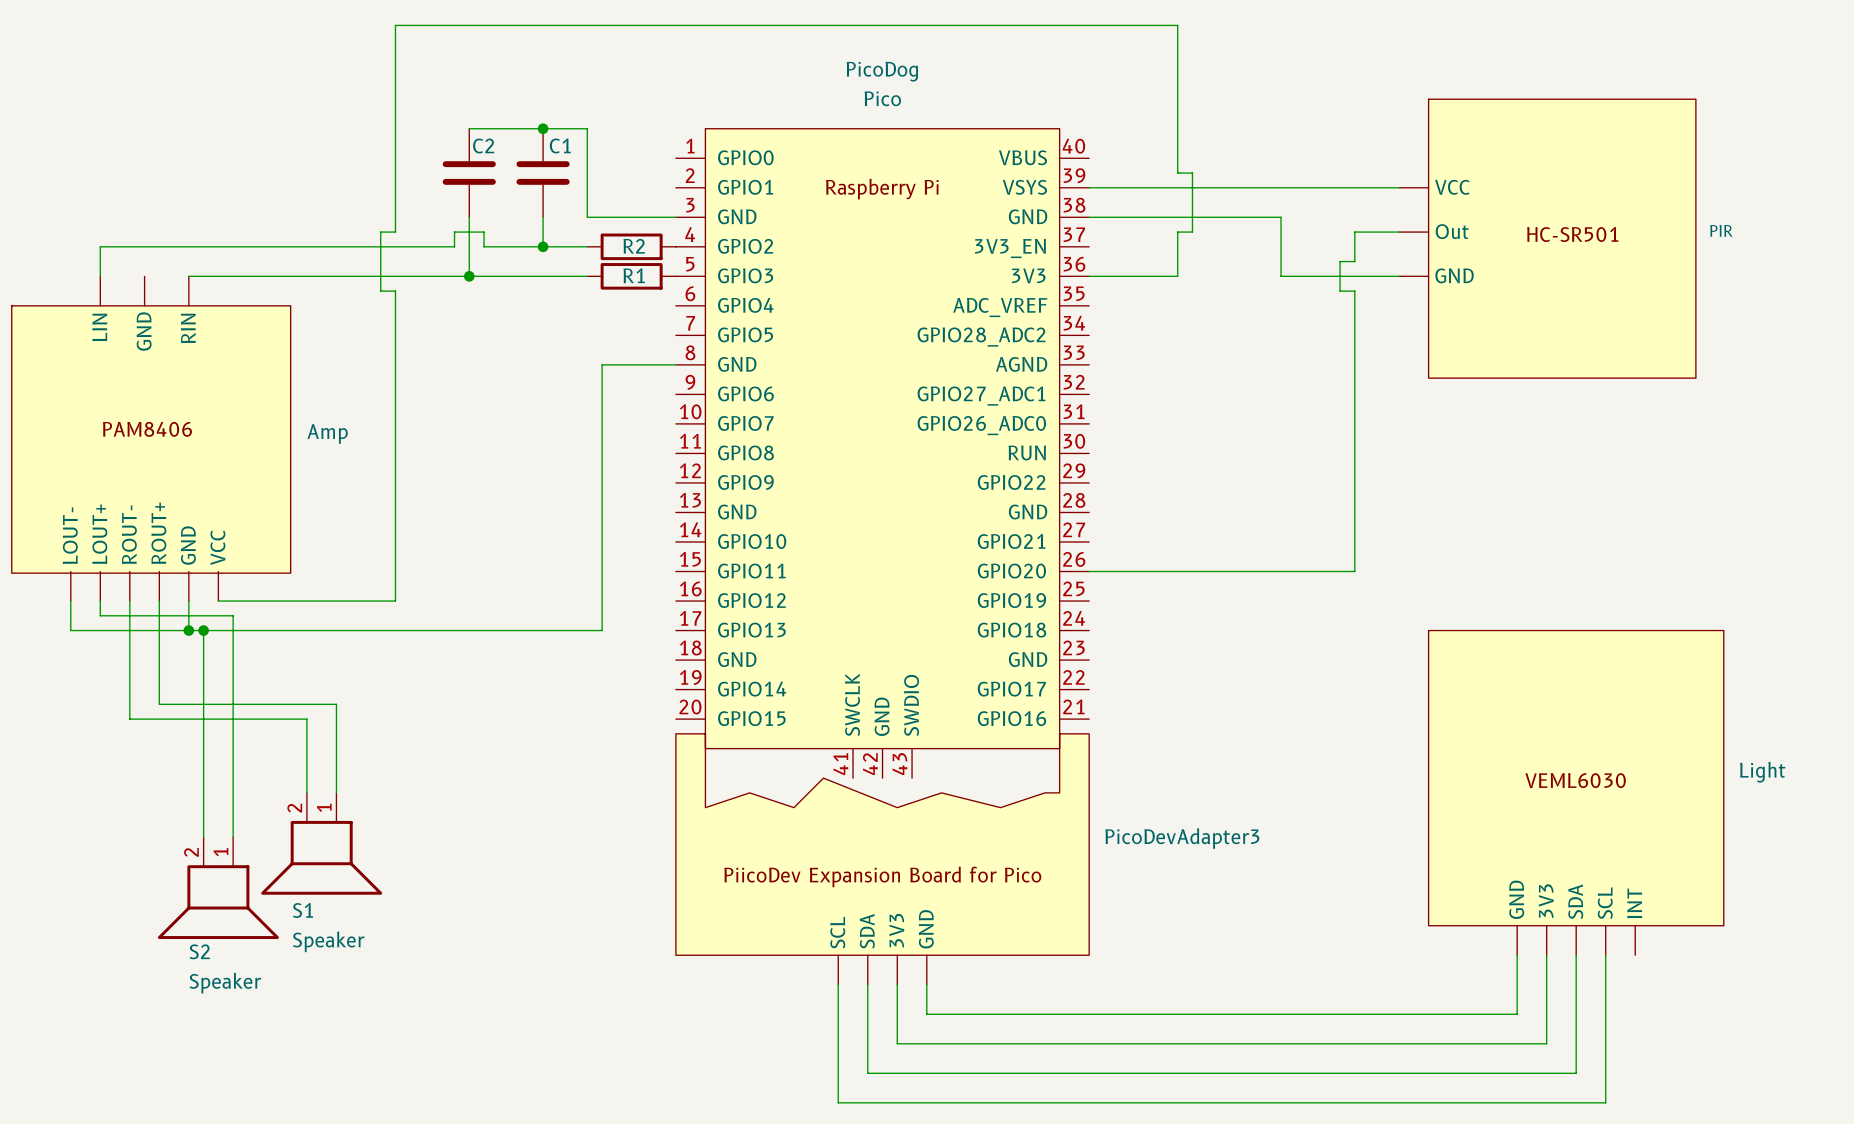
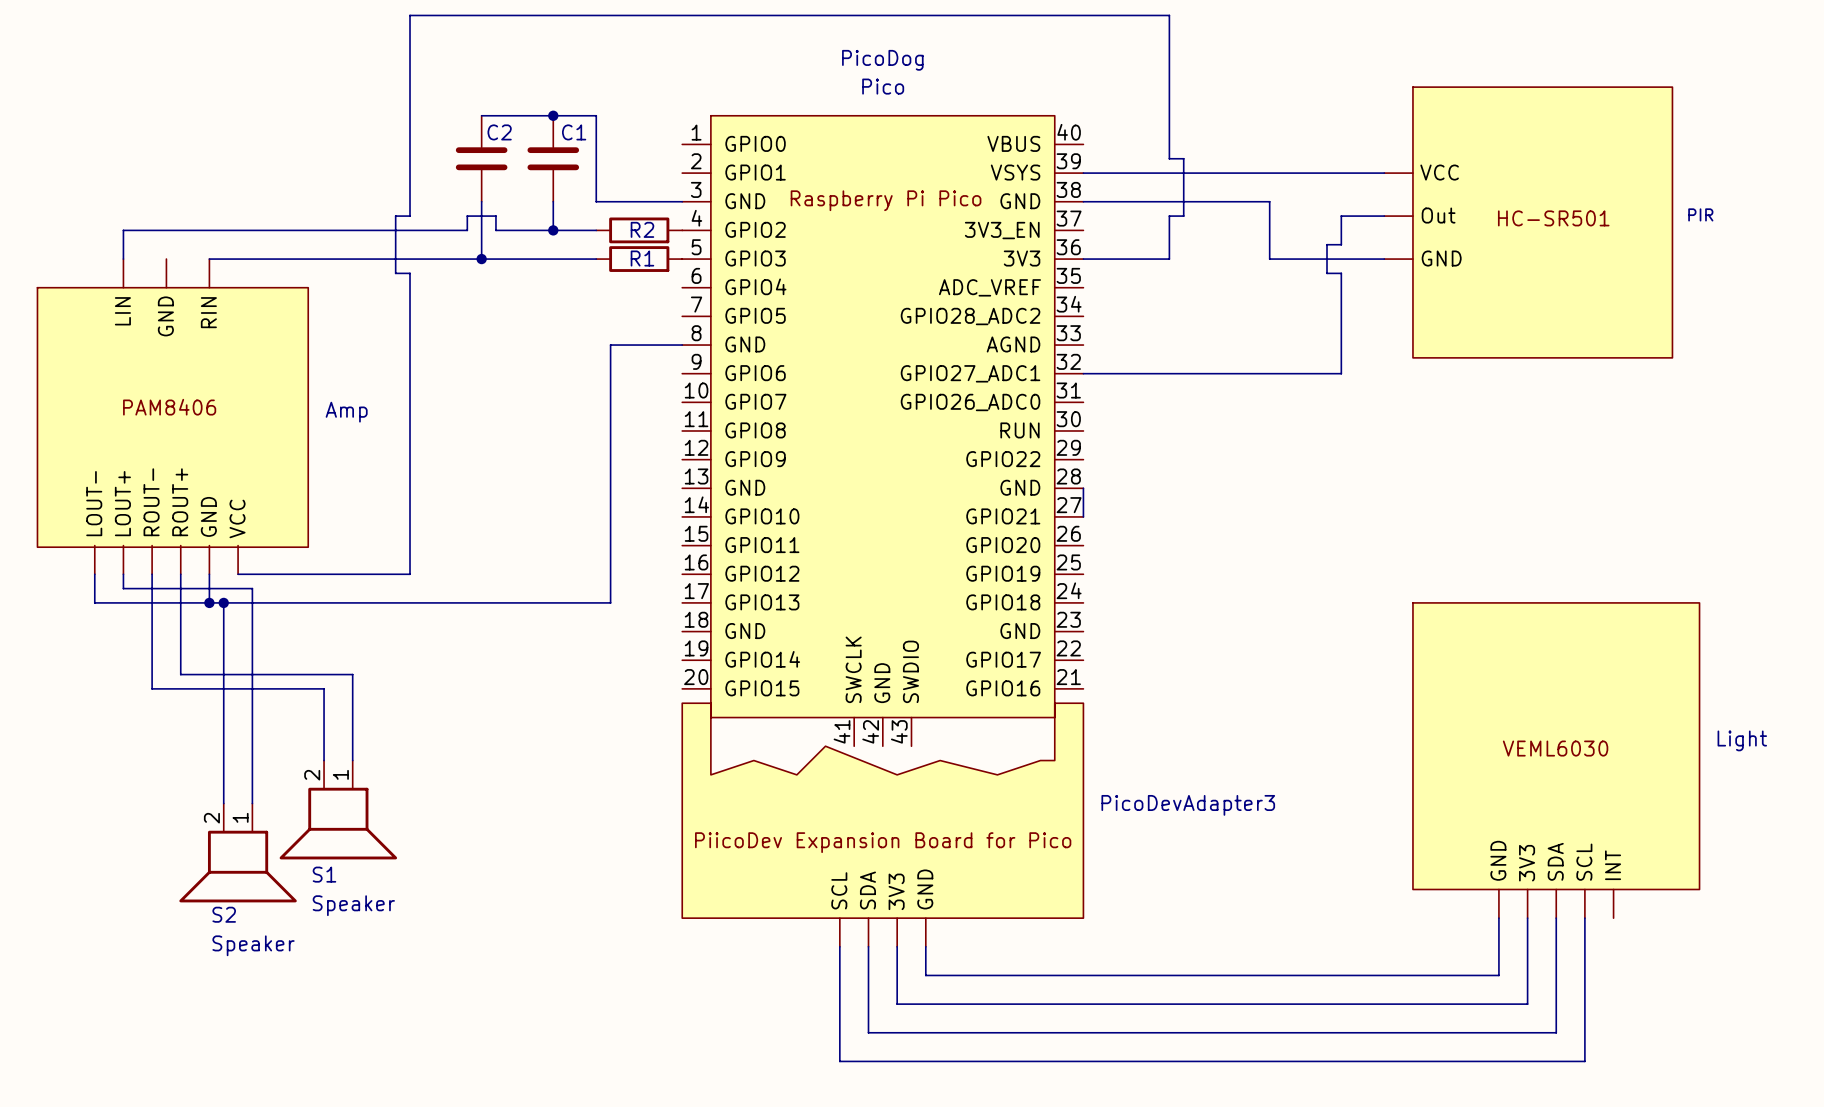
PicoDog text: Raspberry Pi (882, 189) -> none
PicoDog text: none -> Raspberry Pi Pico (886, 200)
wire: (1354, 394) (1354, 571) (1089, 571) -> (1341, 373) (1083, 373)
wire: none -> (1083, 488) (1083, 516)

